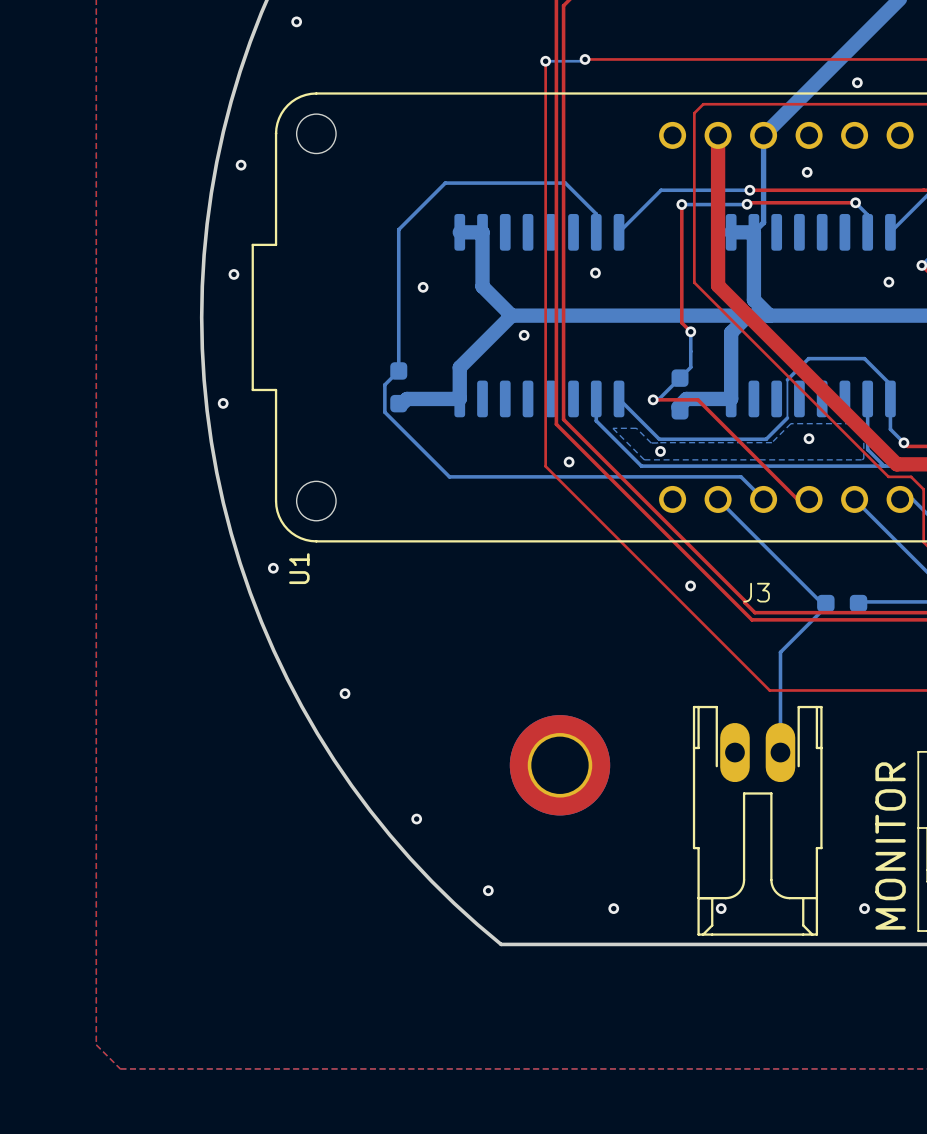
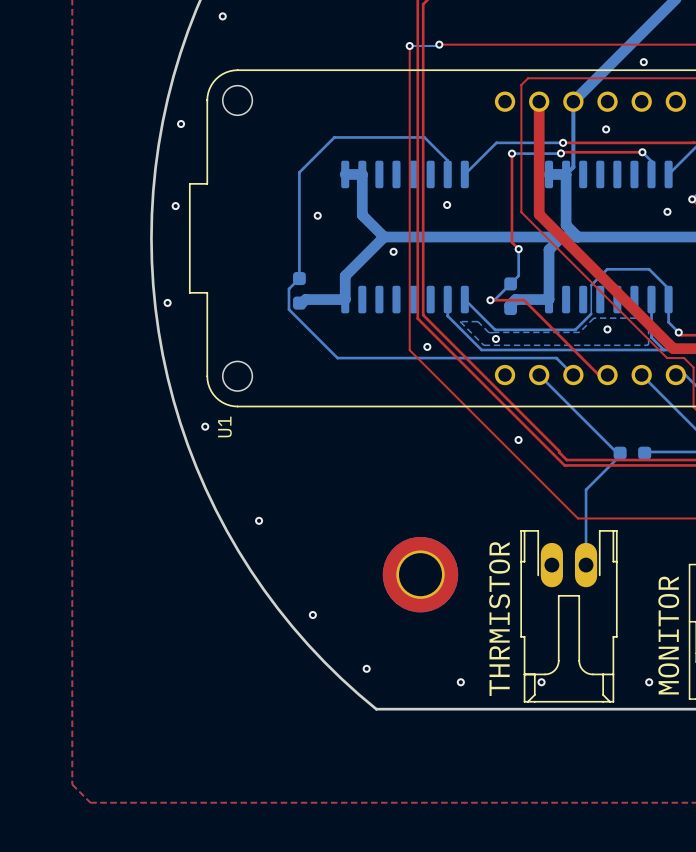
J3 name: J3 (756, 592) -> none
text: none -> THRMISTOR (499, 619)

